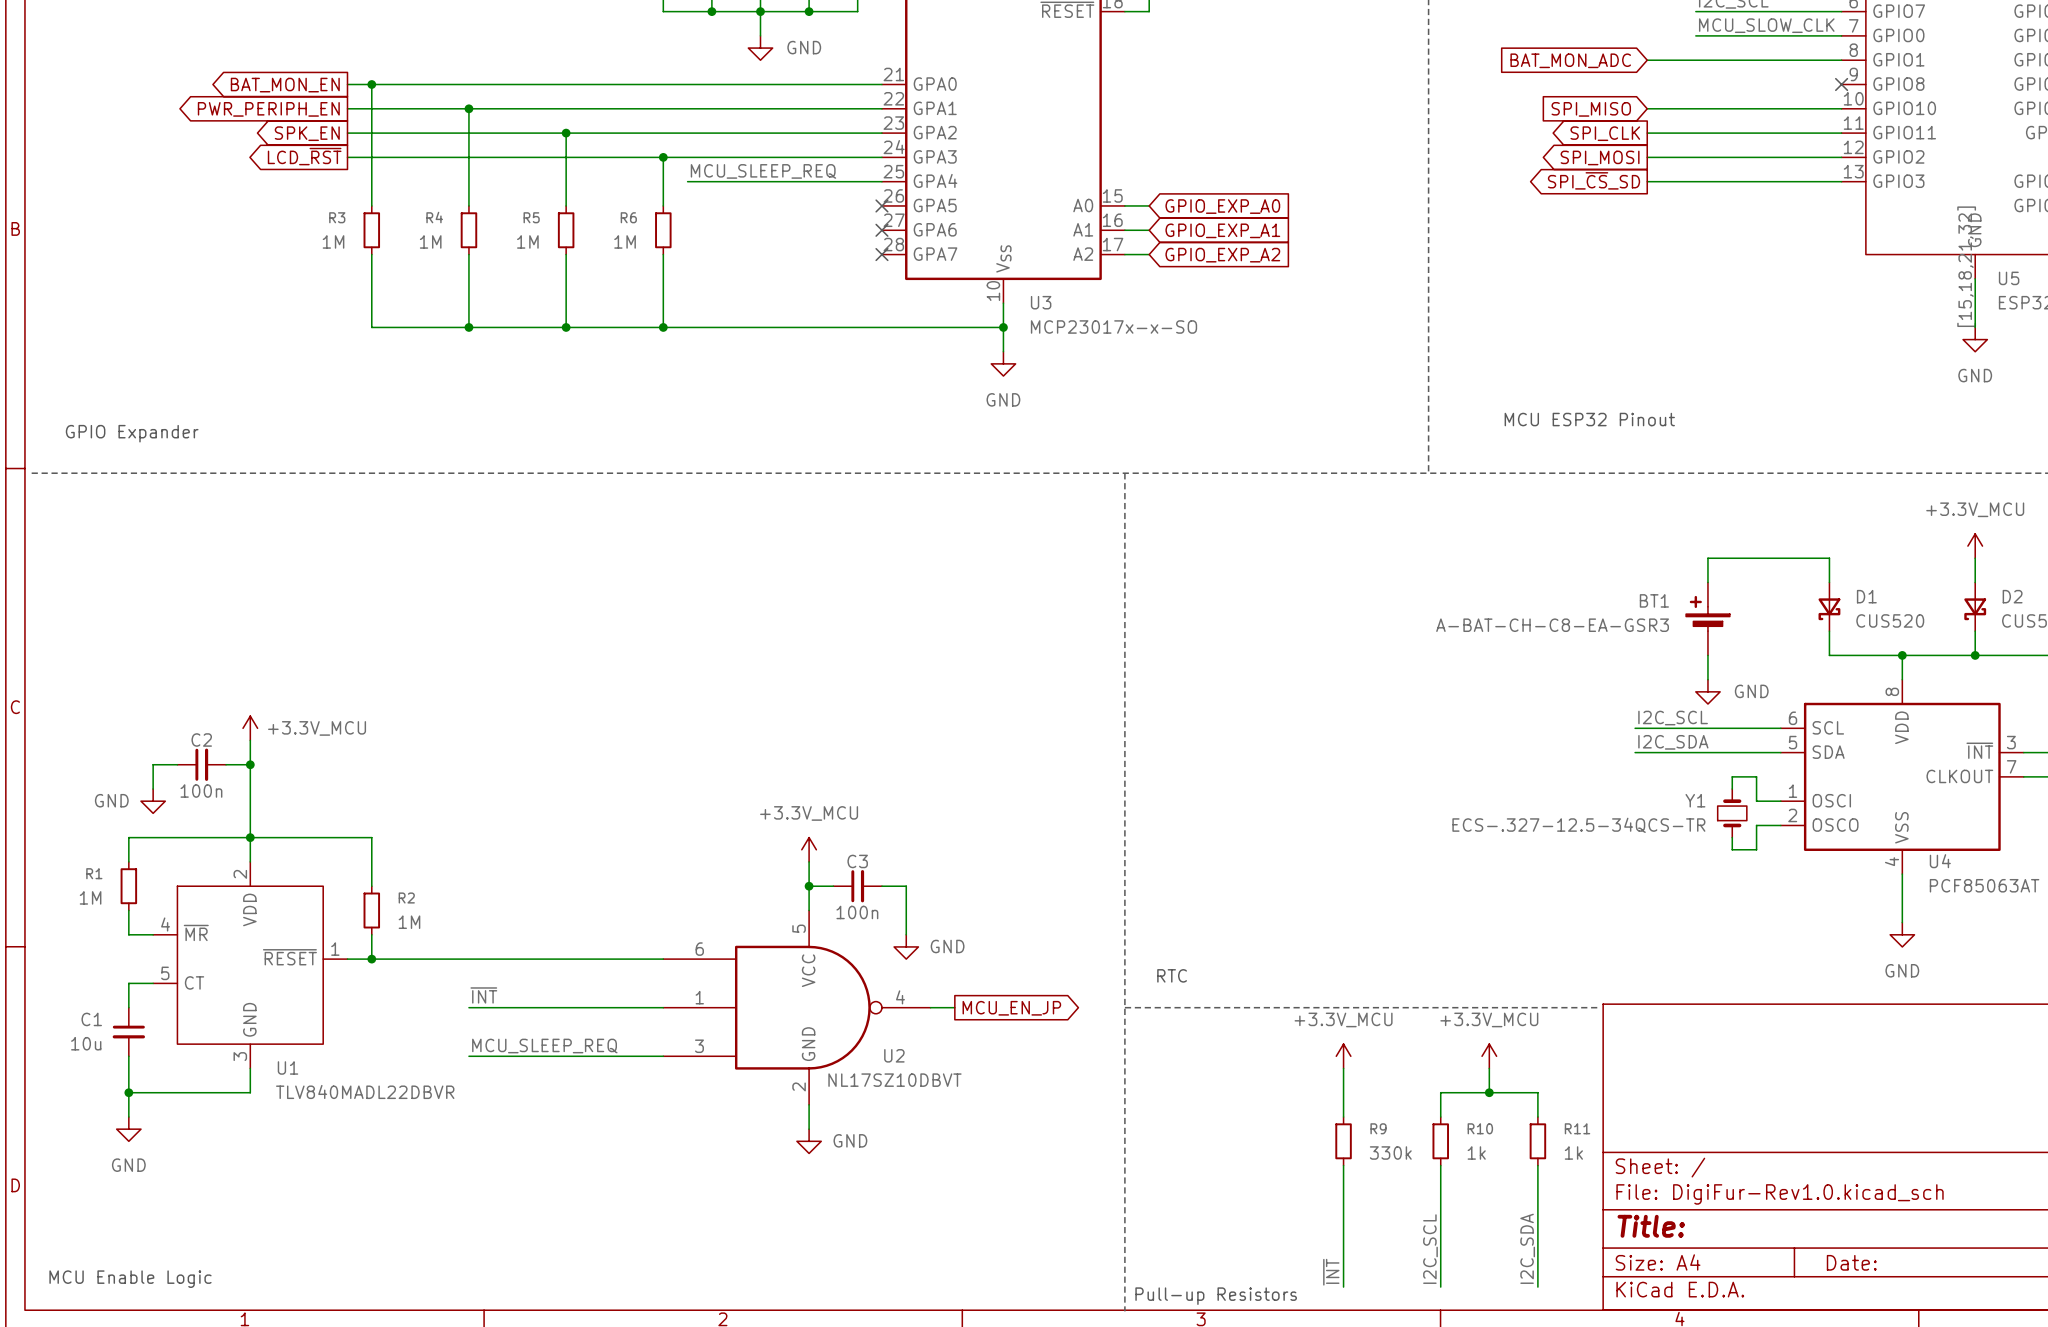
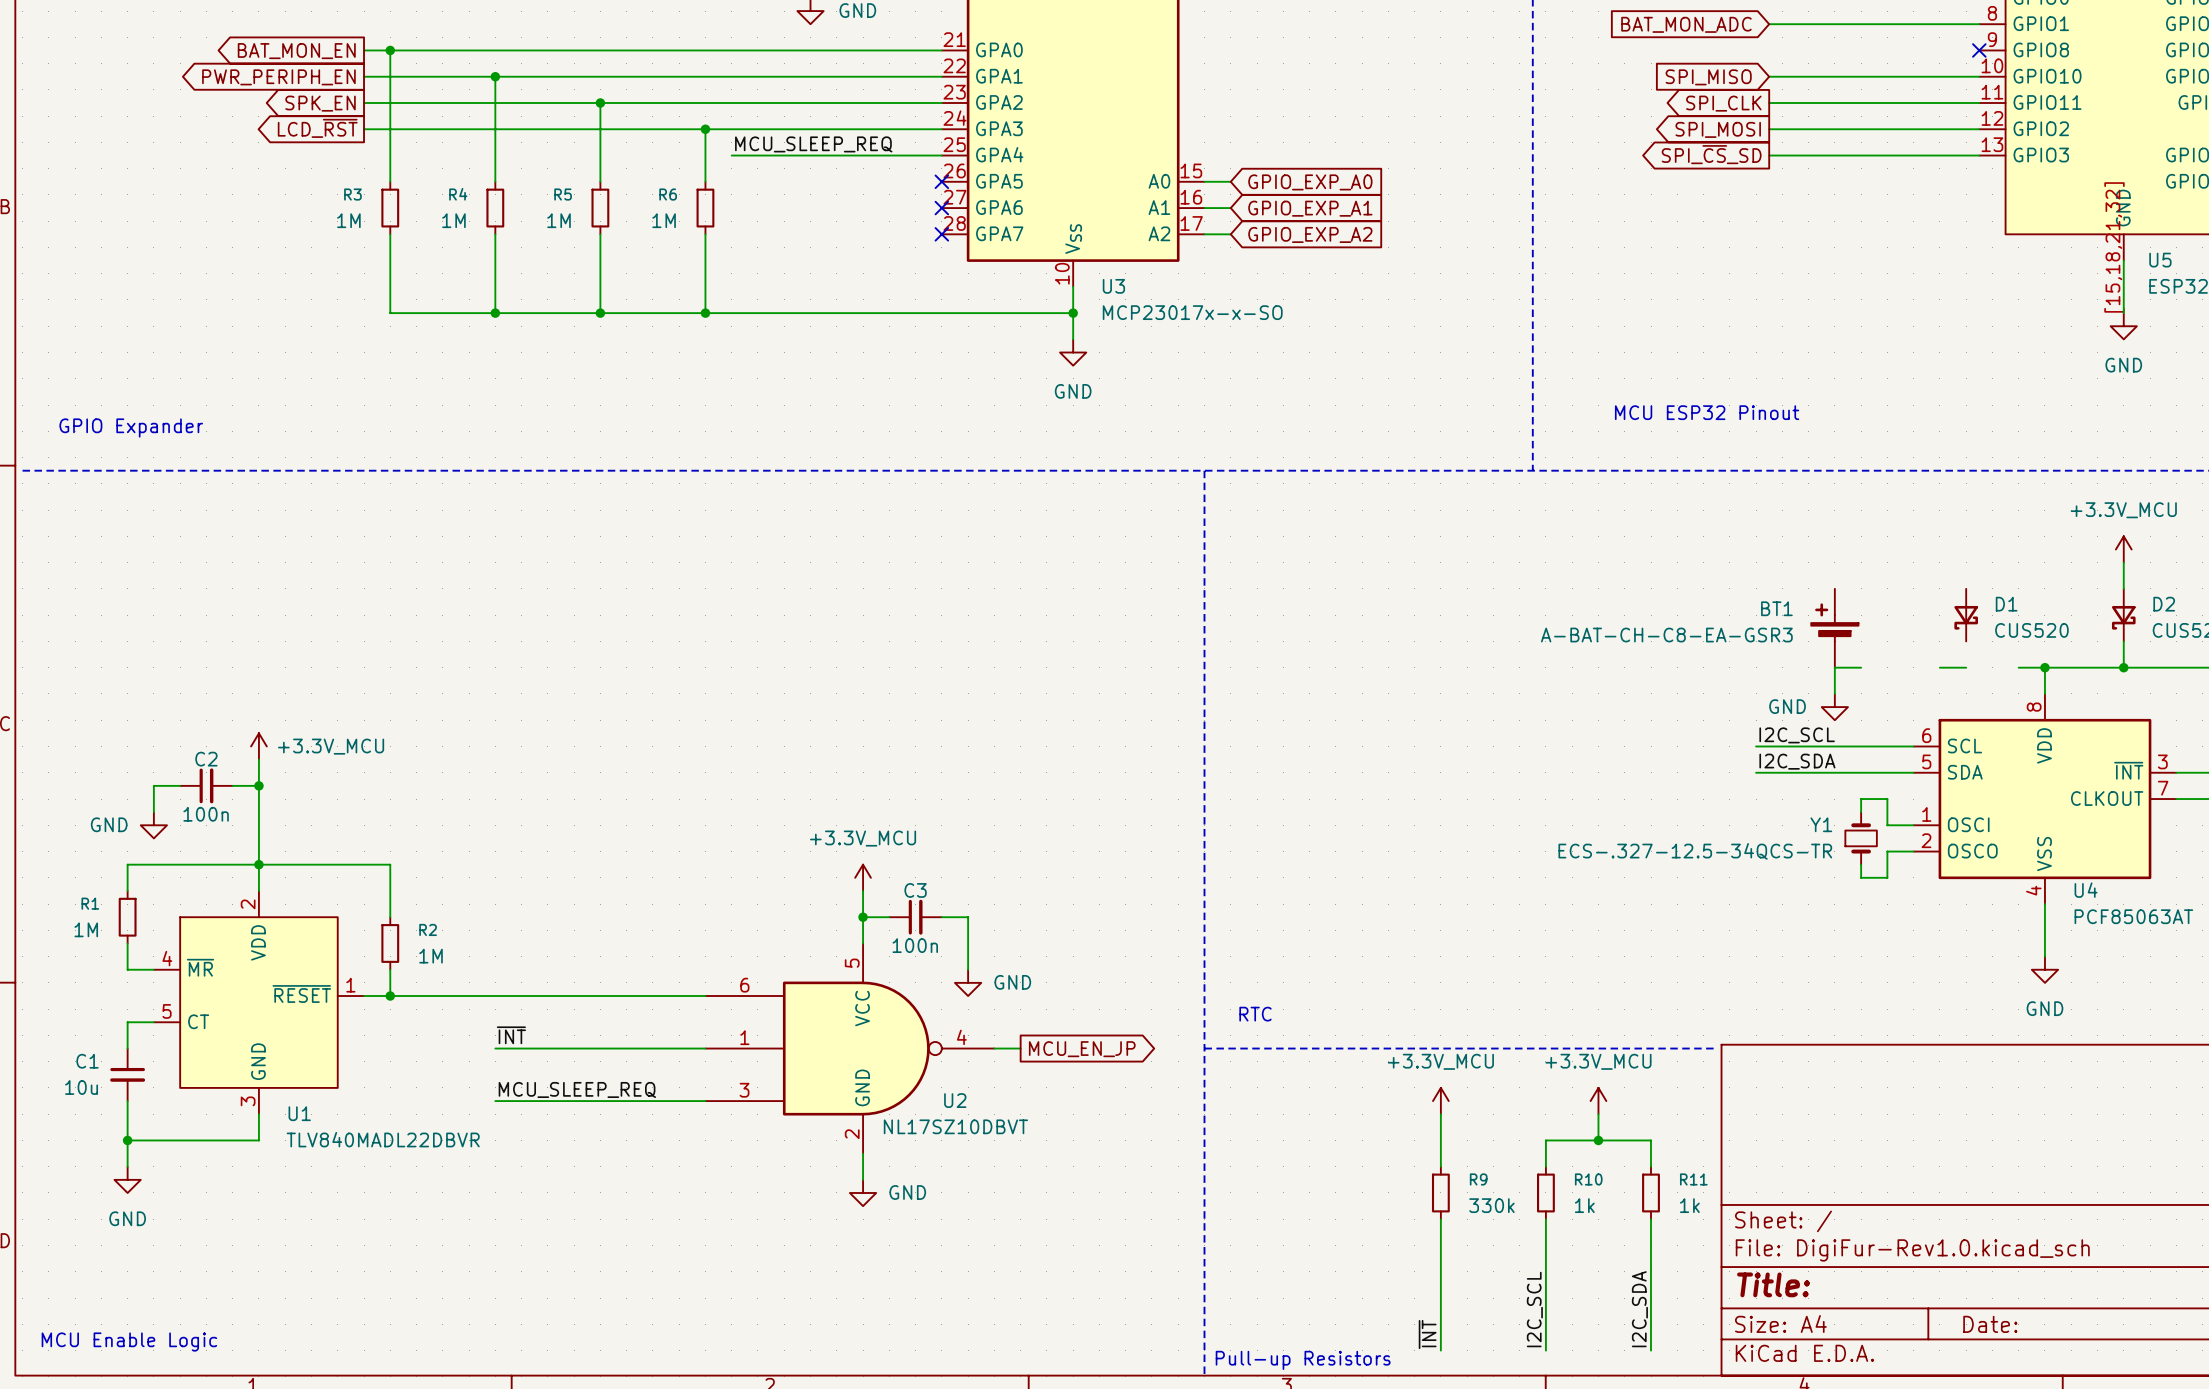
wire: (1707, 582) (1707, 558) (1829, 558) (1829, 582) -> none
wire: (1829, 631) (1829, 655) (1878, 655) -> none
wire: none -> (1834, 667) (1861, 667)
wire: none -> (1939, 667) (1966, 667)
power symbol text position: GND (1751, 691) -> GND (1787, 706)

